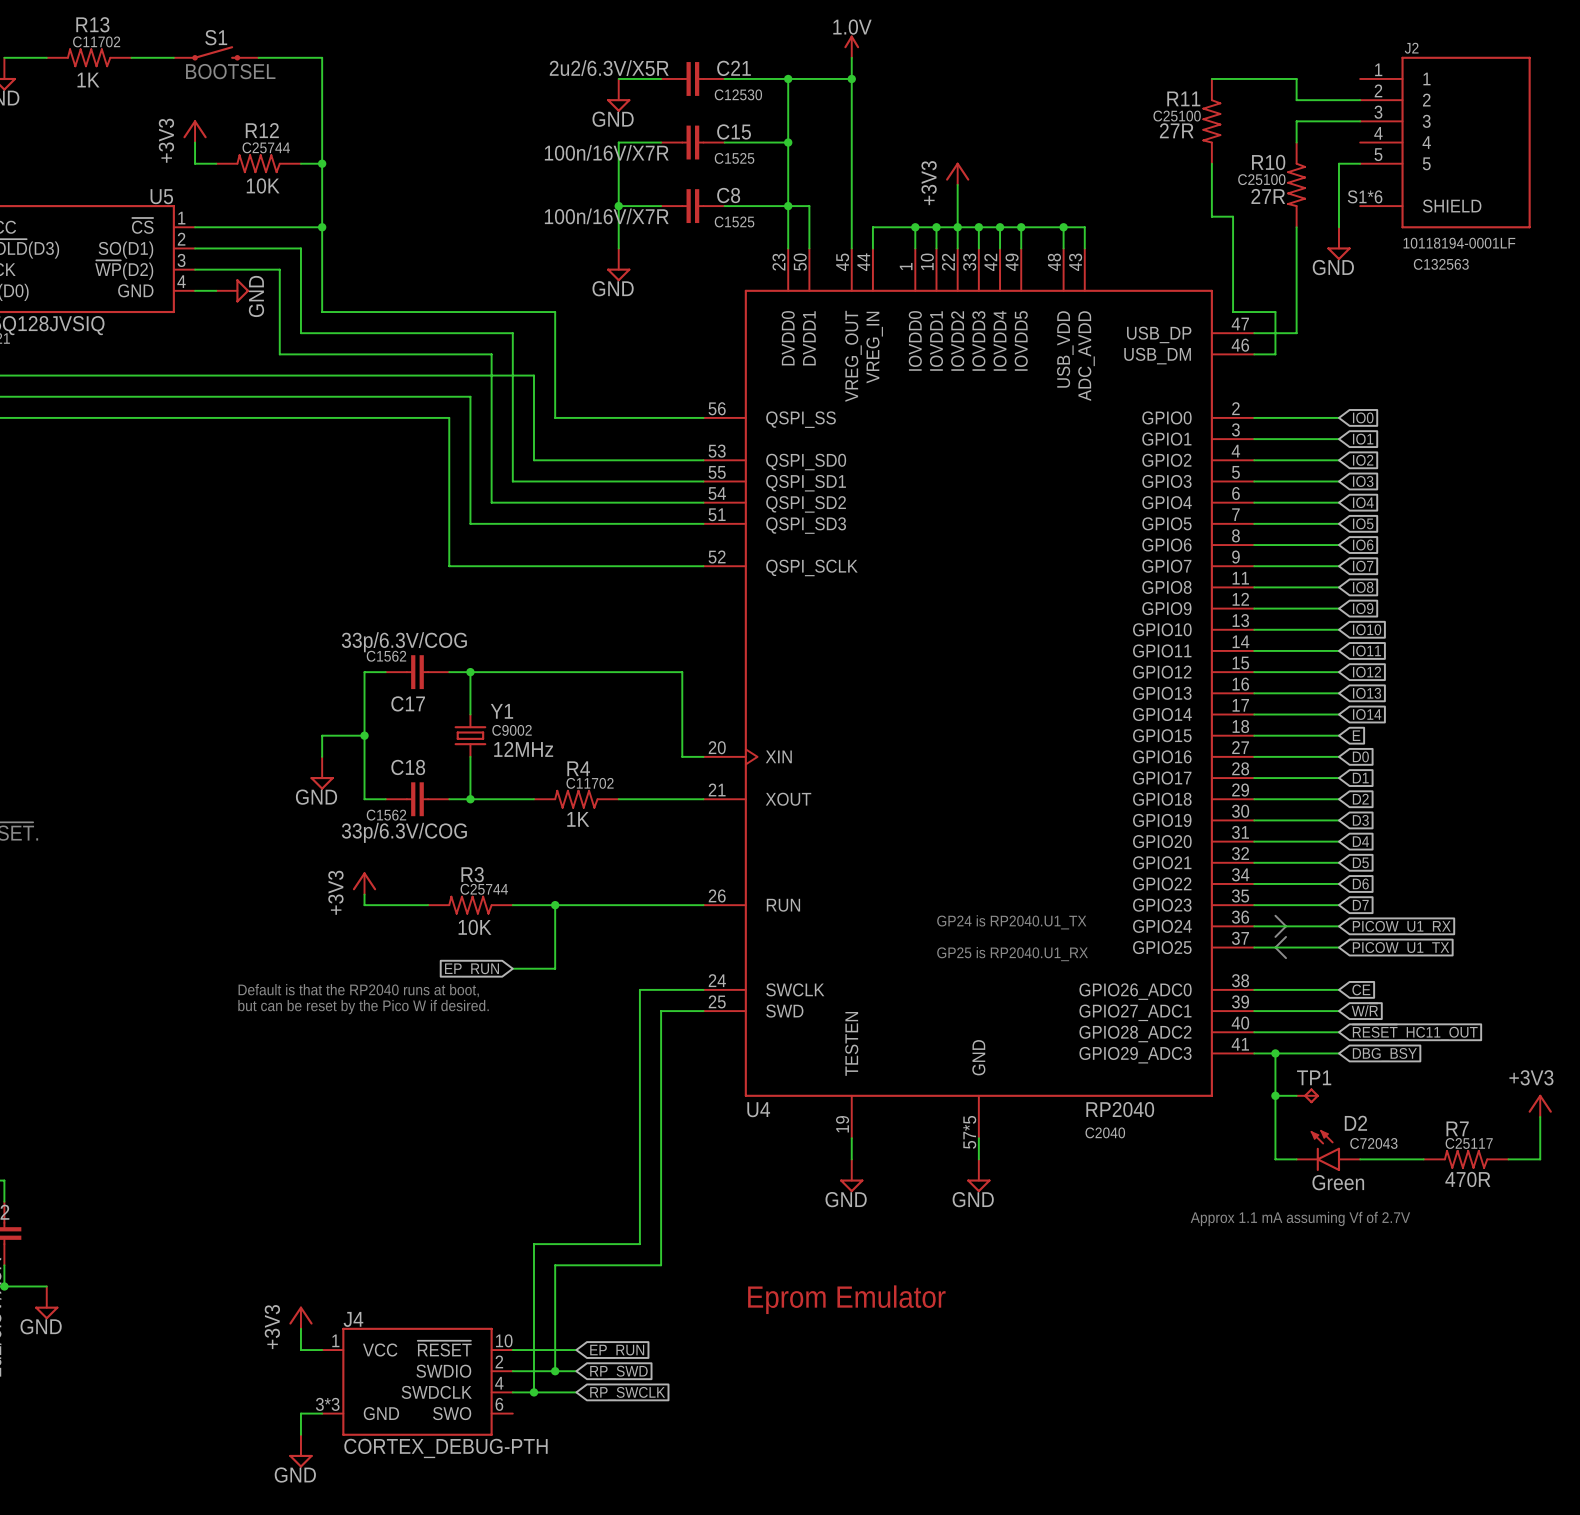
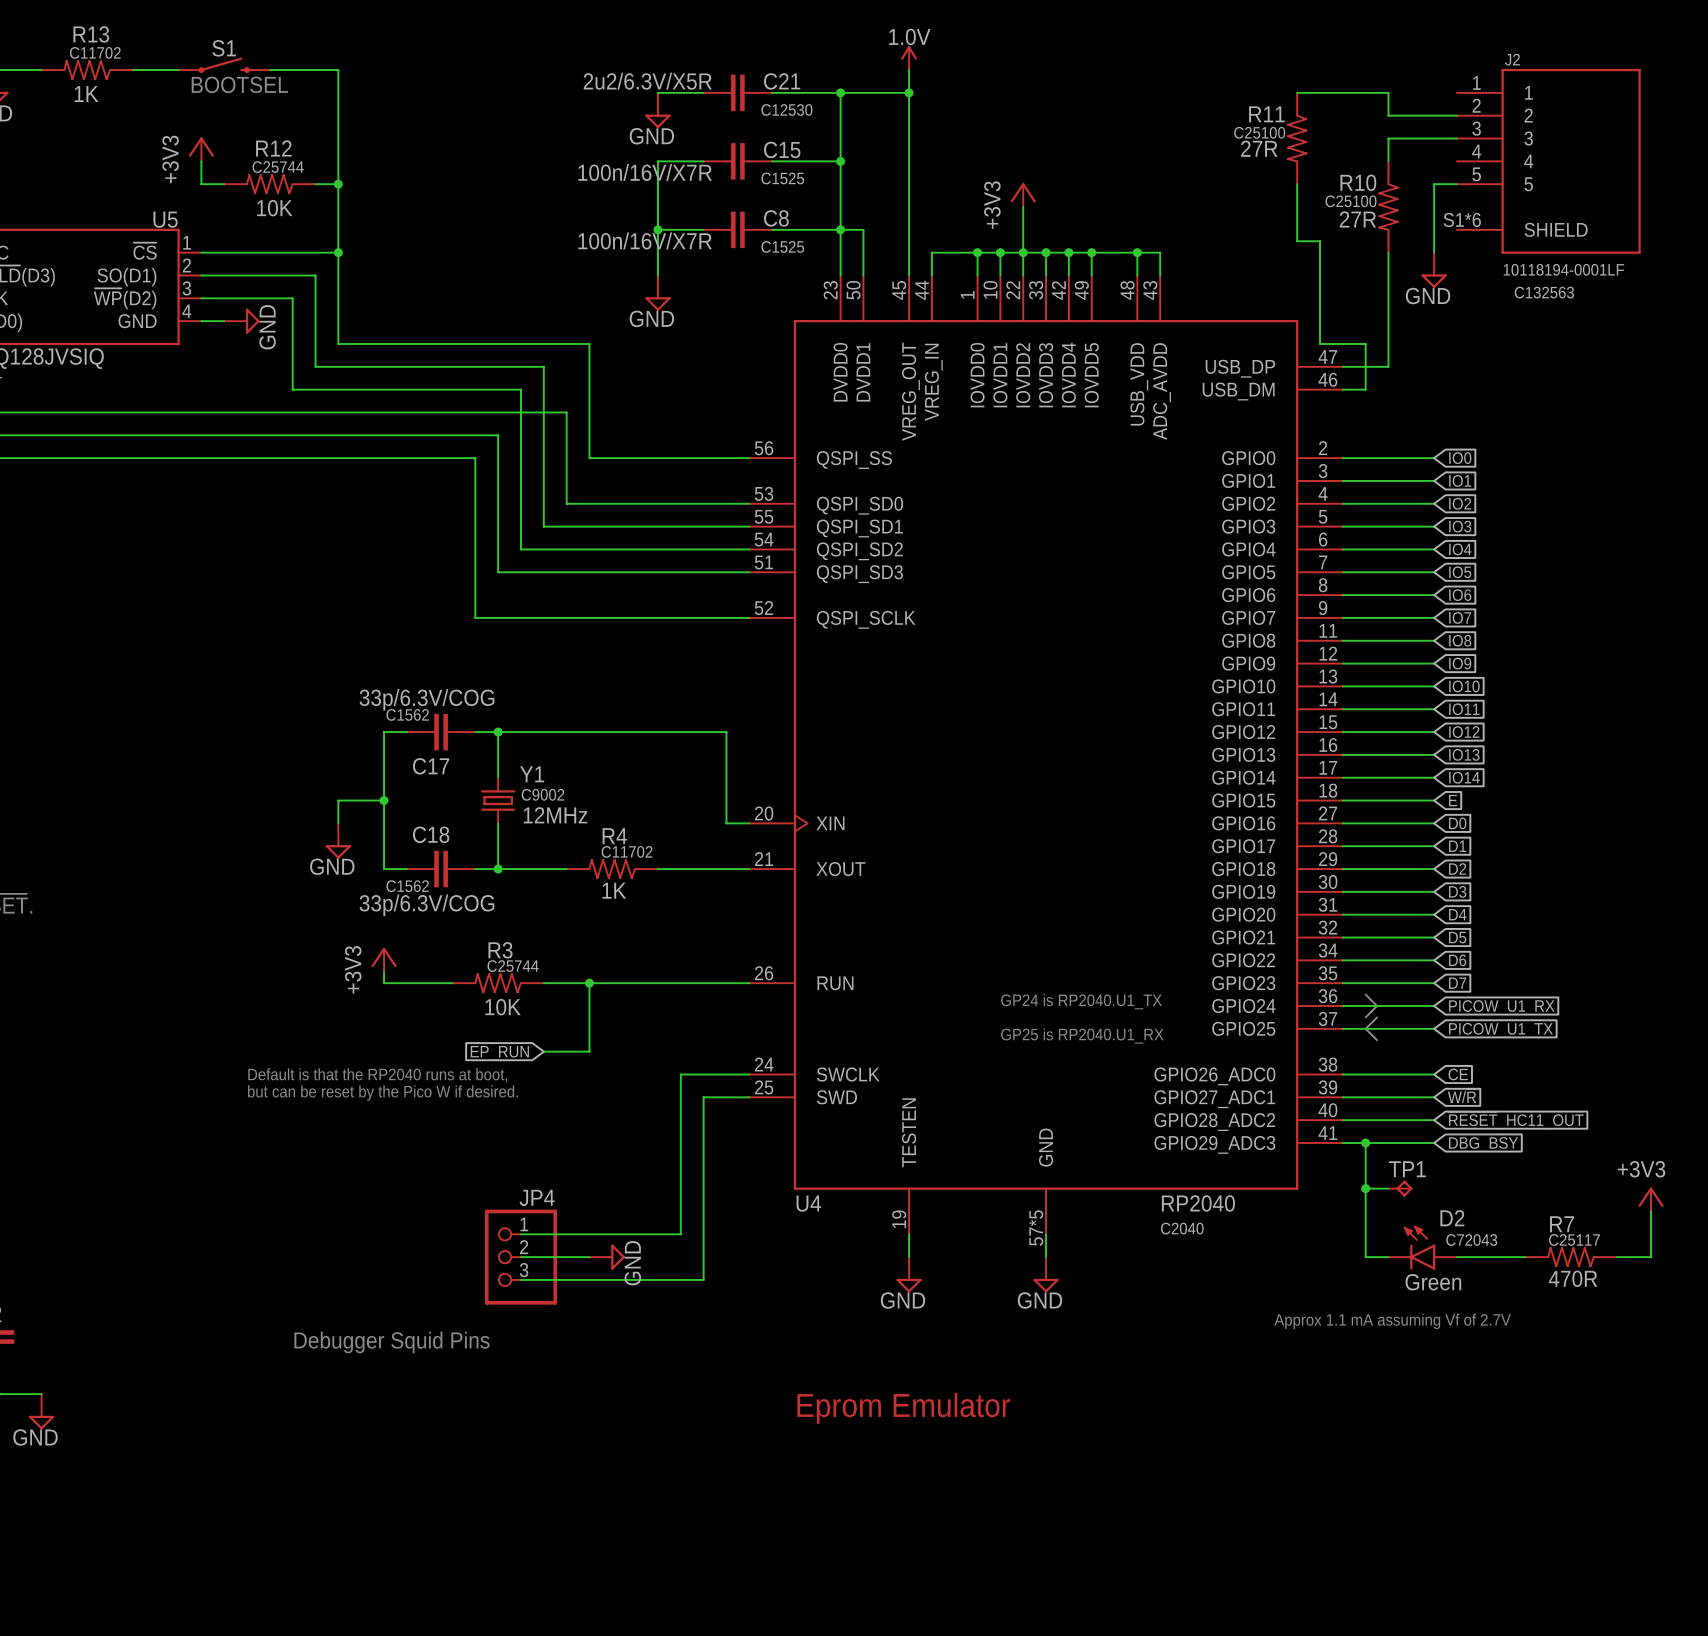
wire: (639, 1138) (639, 1244) (533, 1244) (533, 1392) -> (680, 1234) (521, 1234)
JP4: none -> (521, 1257)
power symbol: none -> GND (607, 1257)
wire: (661, 1180) (661, 1265) (555, 1265) (555, 1371) -> (703, 1279) (521, 1279)
text: none -> Debugger Squid Pins (391, 1342)
power symbol: +3V3 (300, 1317) -> none
wire: (300, 1328) (300, 1350) (322, 1350) -> none
wire: (512, 1350) (576, 1350) -> (521, 1257) (589, 1257)
global label: EP_RUN (617, 1351) -> none
wire: (512, 1371) (576, 1371) -> none
junction: (555, 1371) -> none
global label: RP_SWD (618, 1372) -> none
J4: CORTEX_DEBUG-PTH (417, 1381) -> none
wire: (512, 1392) (576, 1392) -> none
junction: (533, 1392) -> none
global label: RP_SWCLK (627, 1393) -> none
wire: (322, 1413) (300, 1413) (300, 1434) -> none
power symbol: GND (300, 1451) -> none

